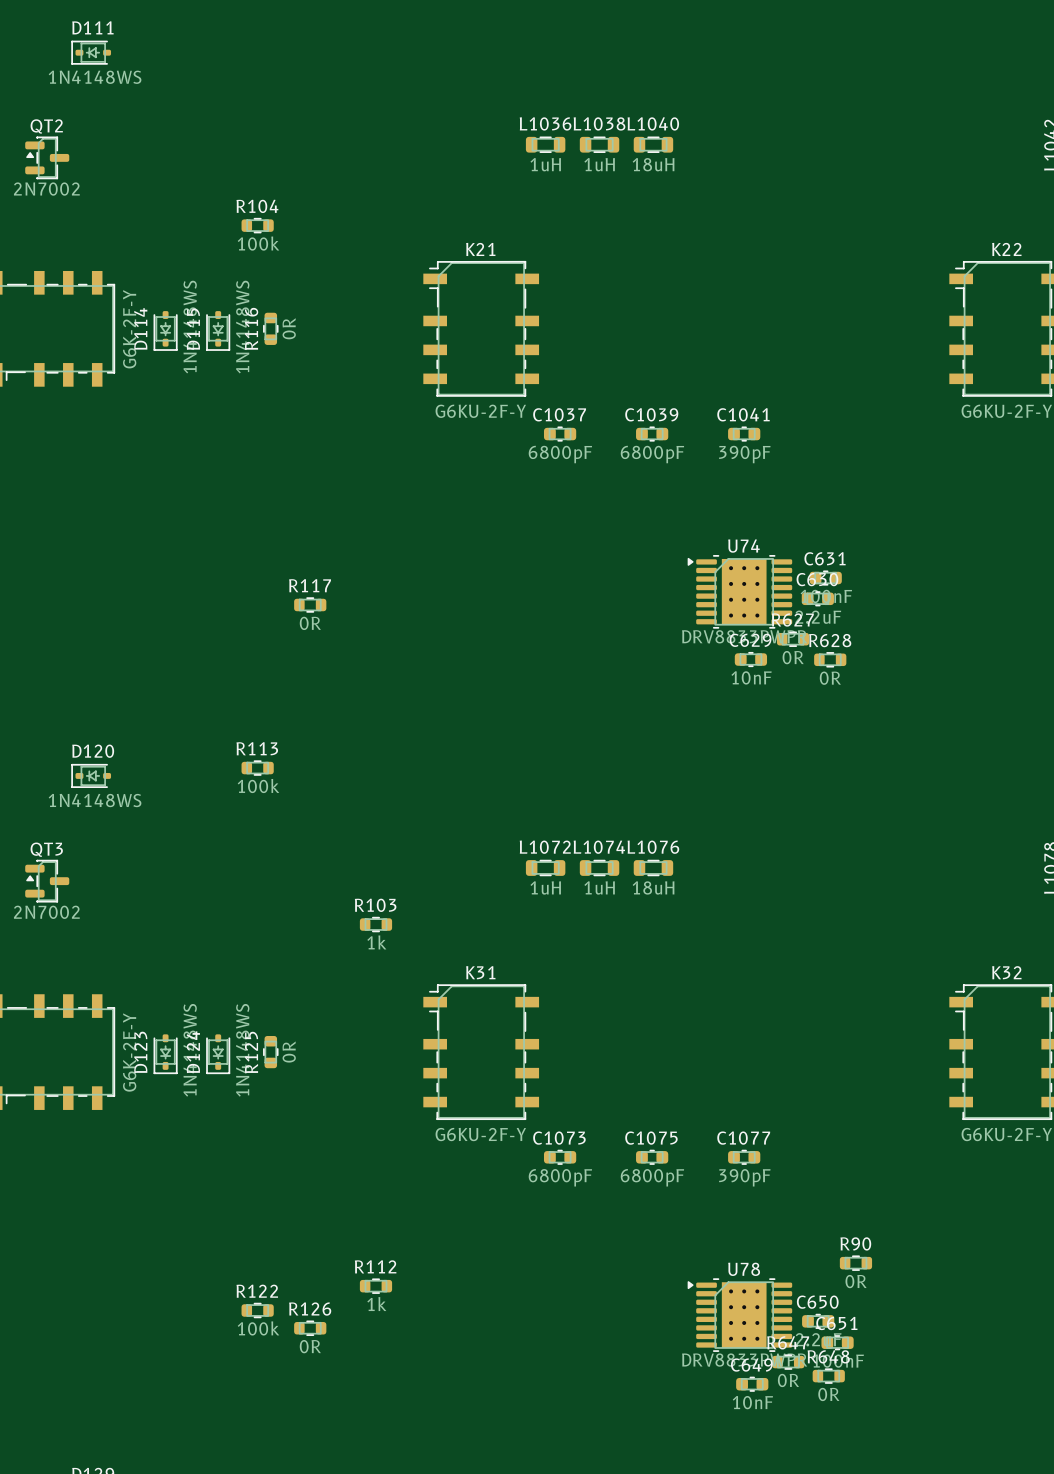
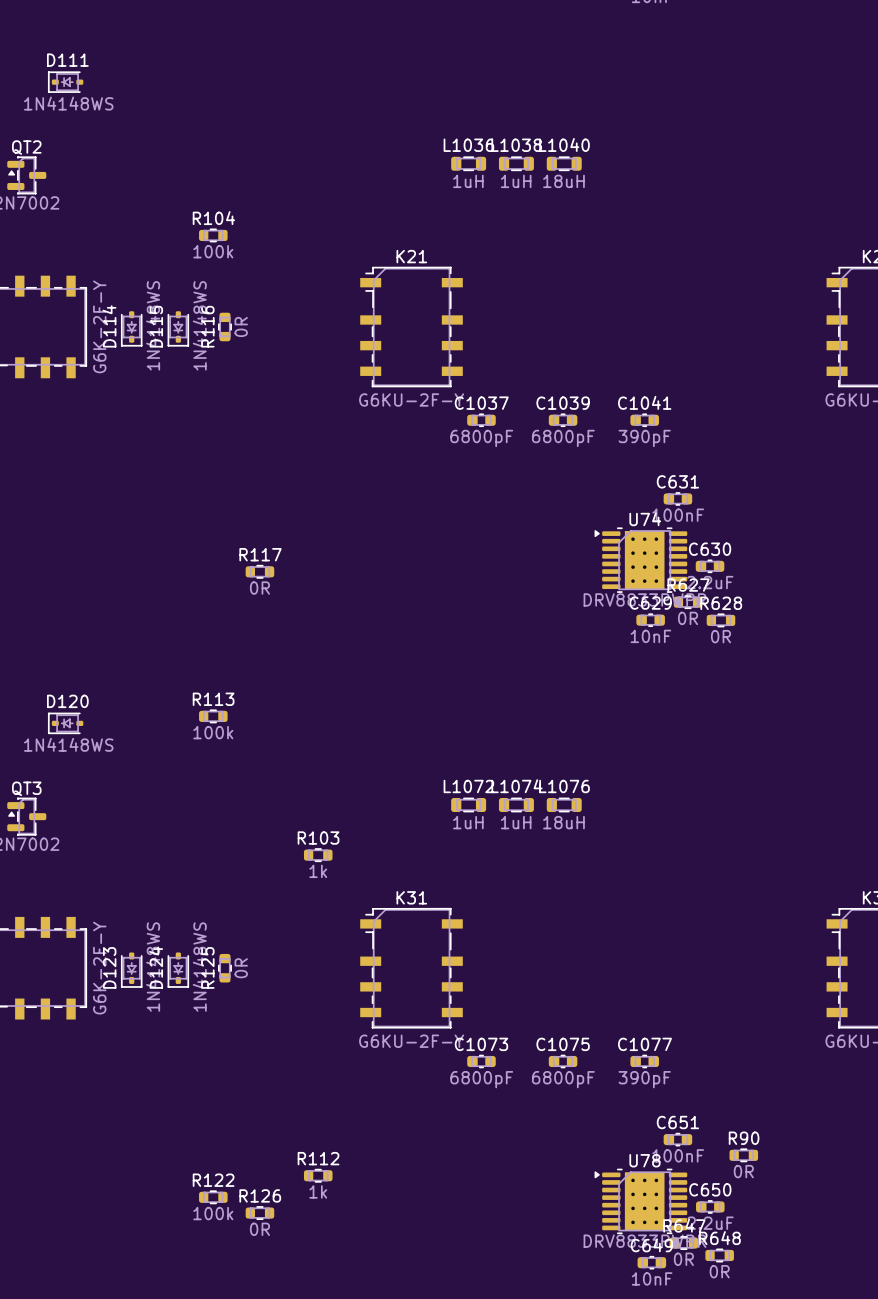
C631 position: (825, 578) -> (677, 498)
C651 position: (837, 1342) -> (677, 1139)

